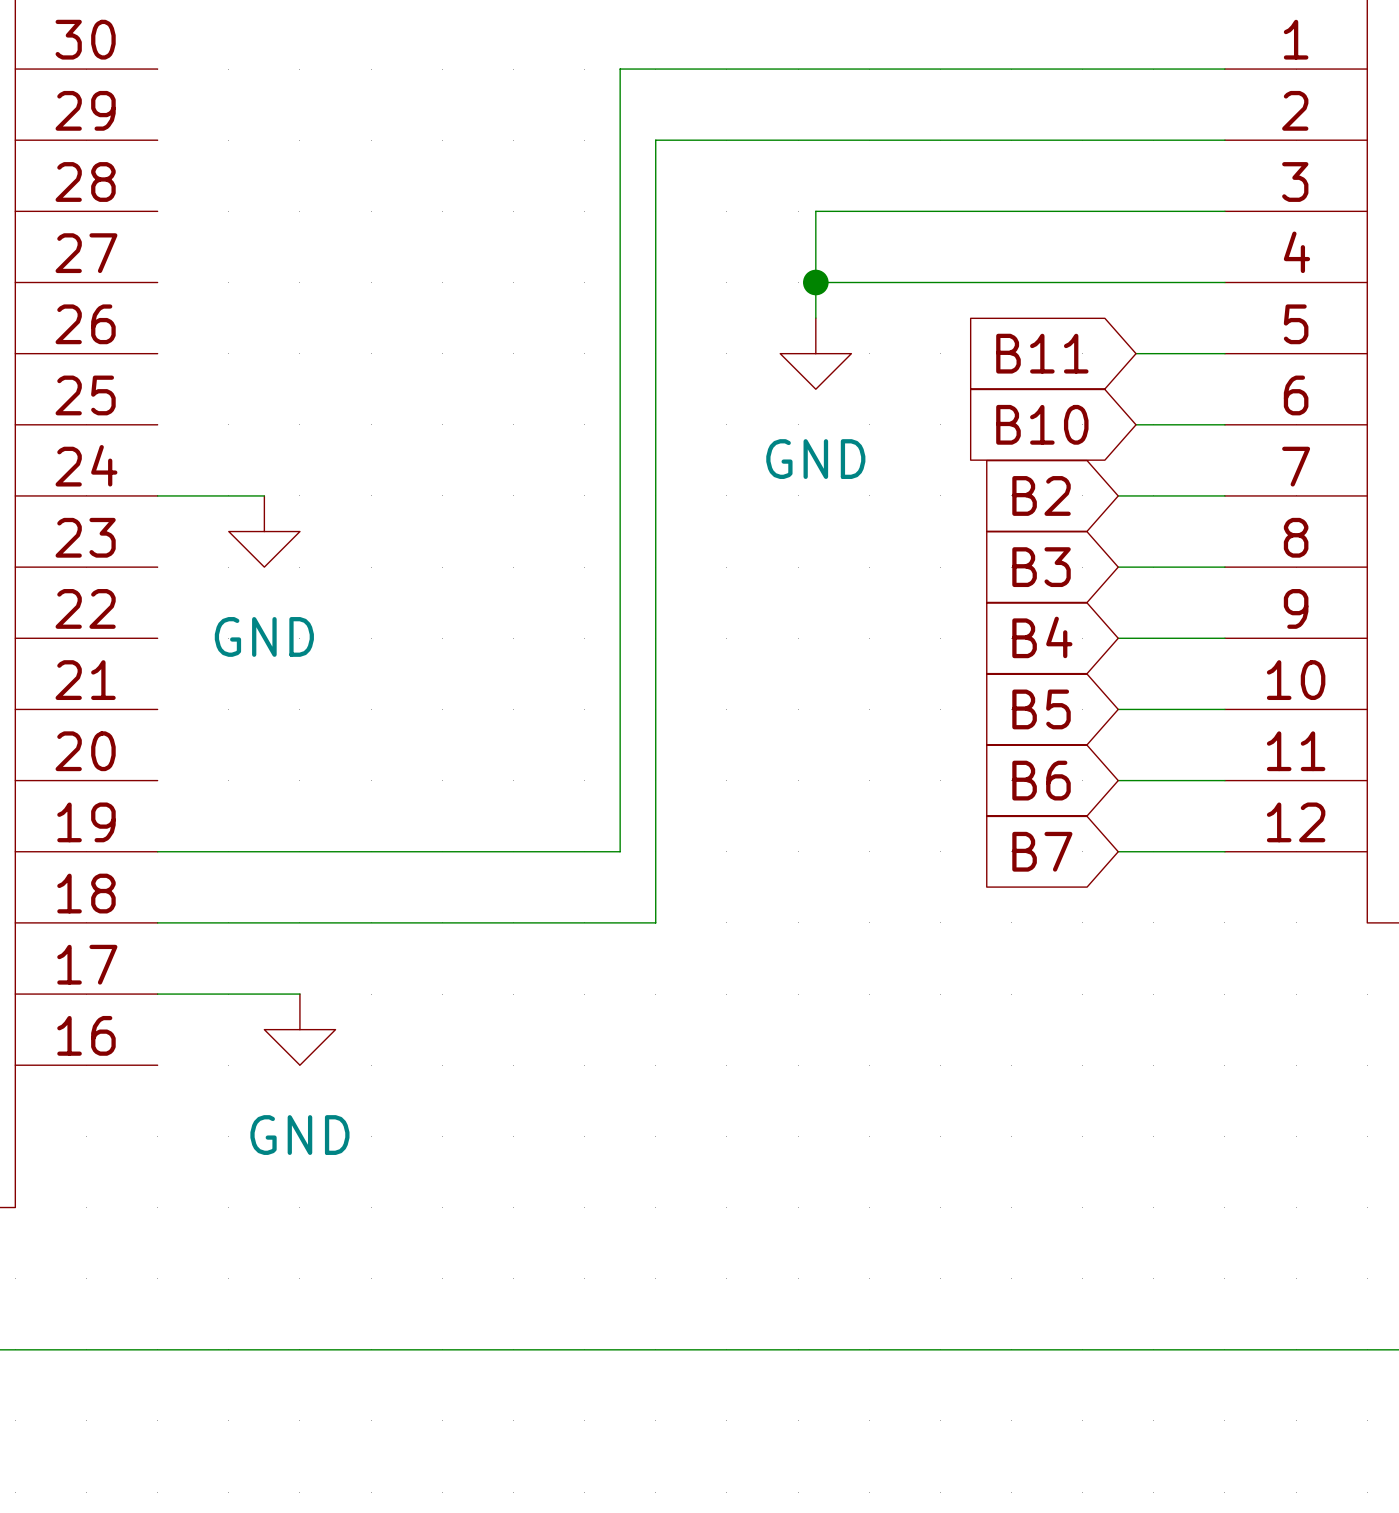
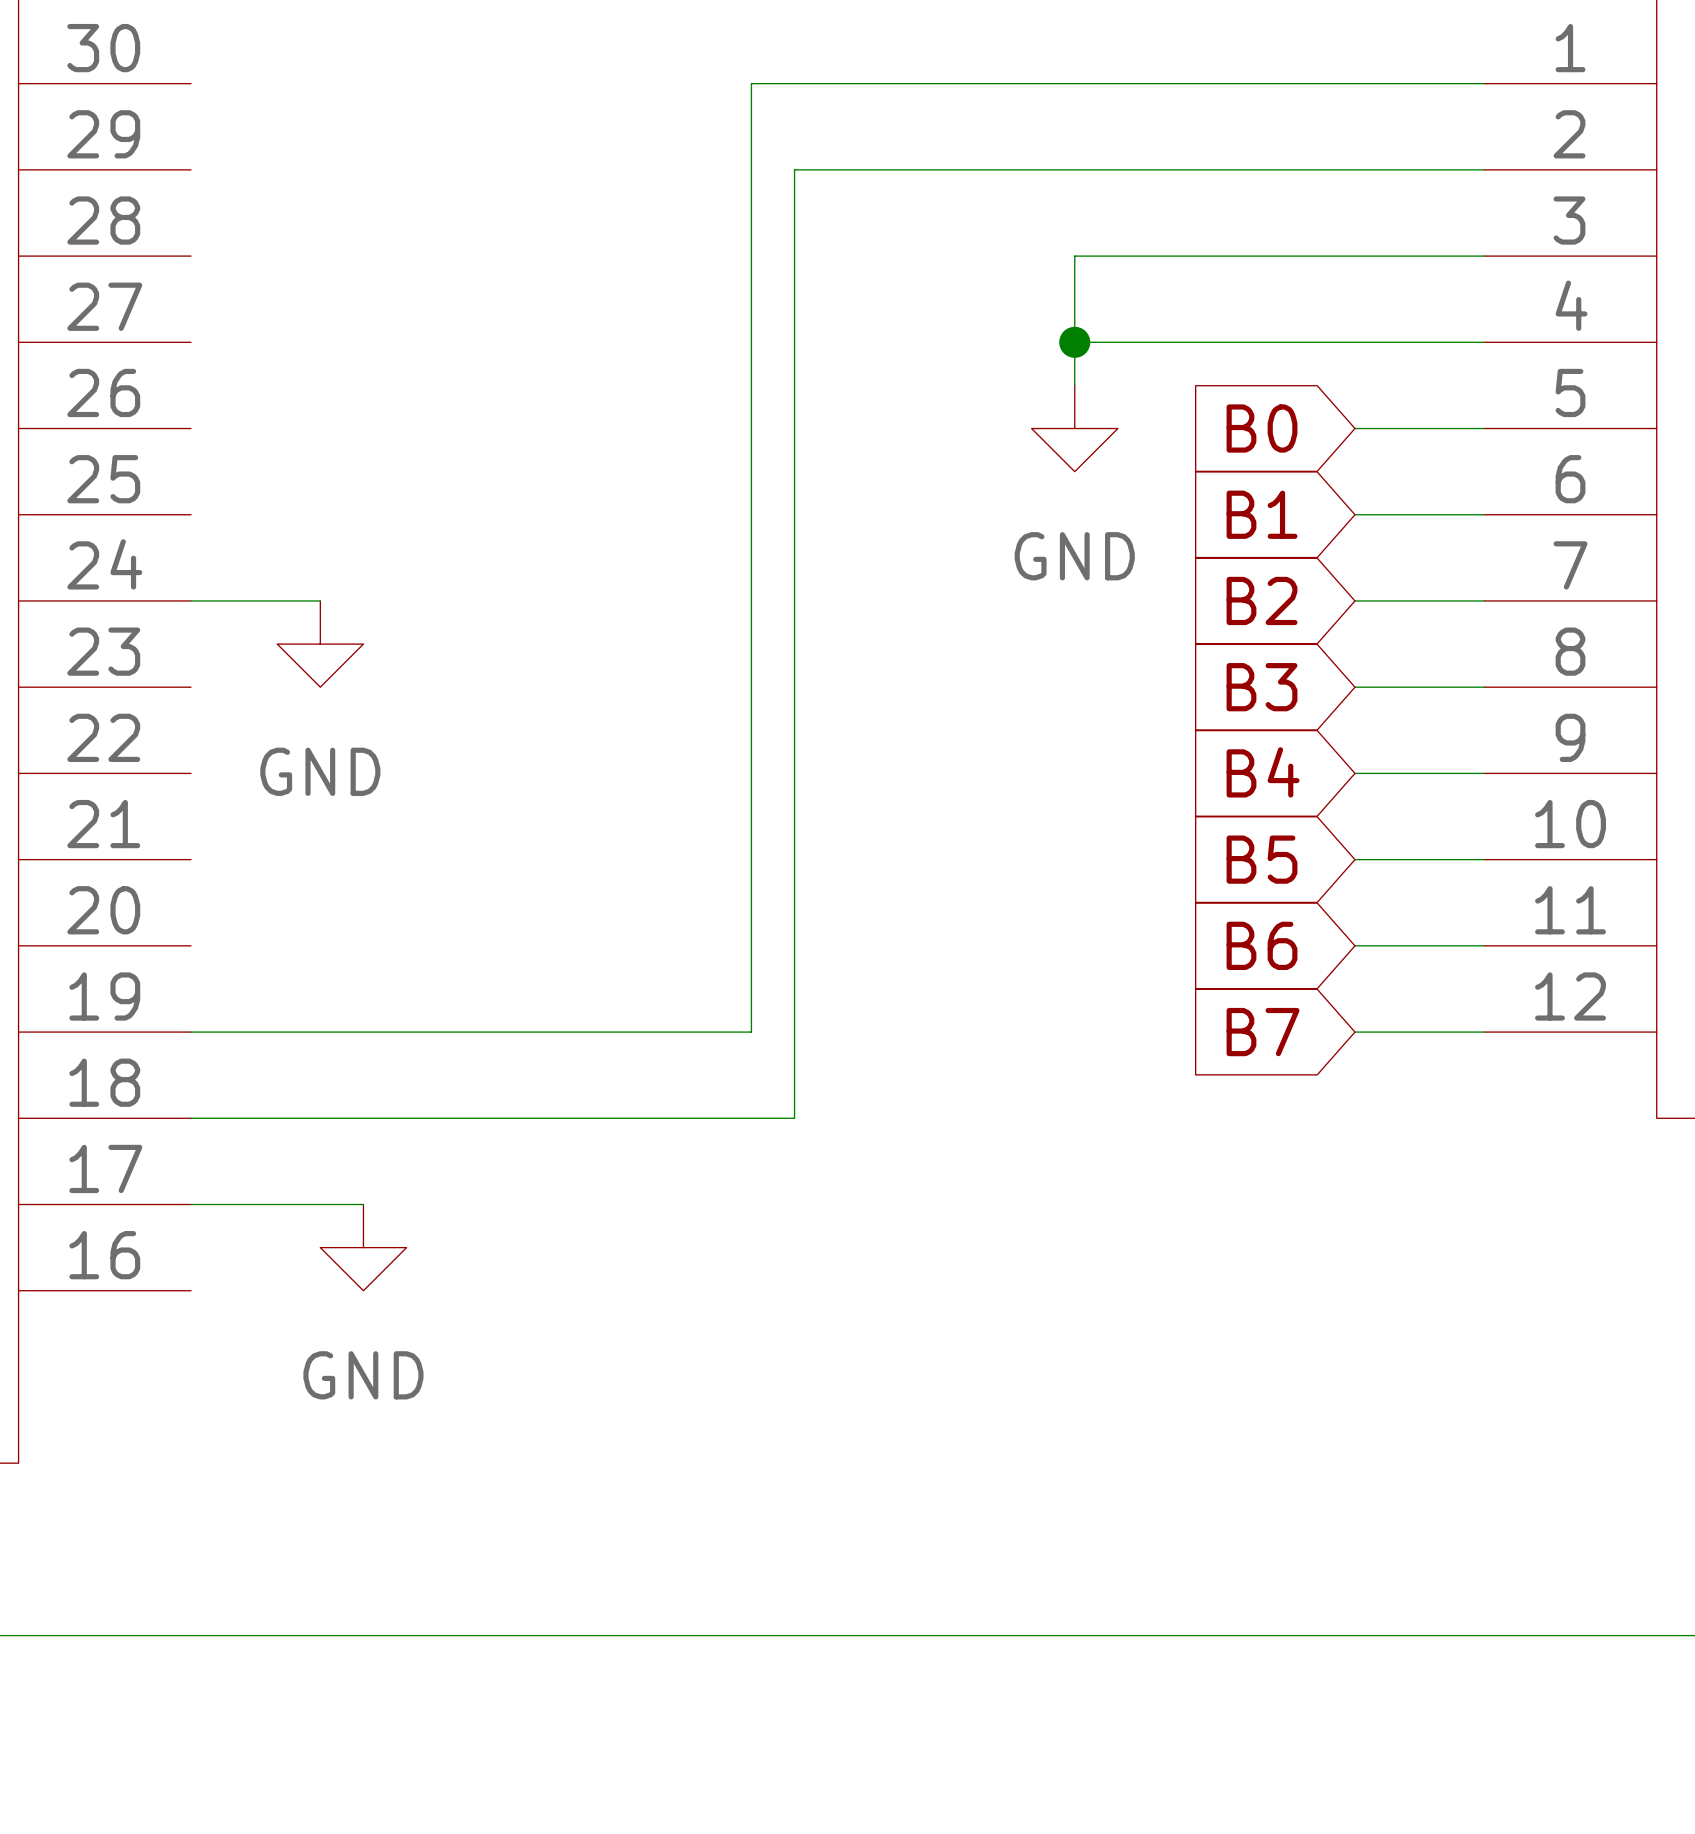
wire: (886, 211) (815, 211) (815, 318) -> (1074, 256) (1074, 385)
wire: (815, 282) (886, 282) -> none
junction position: (815, 282) -> (1074, 342)
power symbol position: GND (815, 353) -> GND (1074, 428)
global label: B11 (1042, 353) -> B0 (1262, 428)
wire: none -> (1354, 428) (1376, 428)
global label: B10 (1042, 424) -> B1 (1262, 514)
wire: none -> (1354, 514) (1376, 514)

